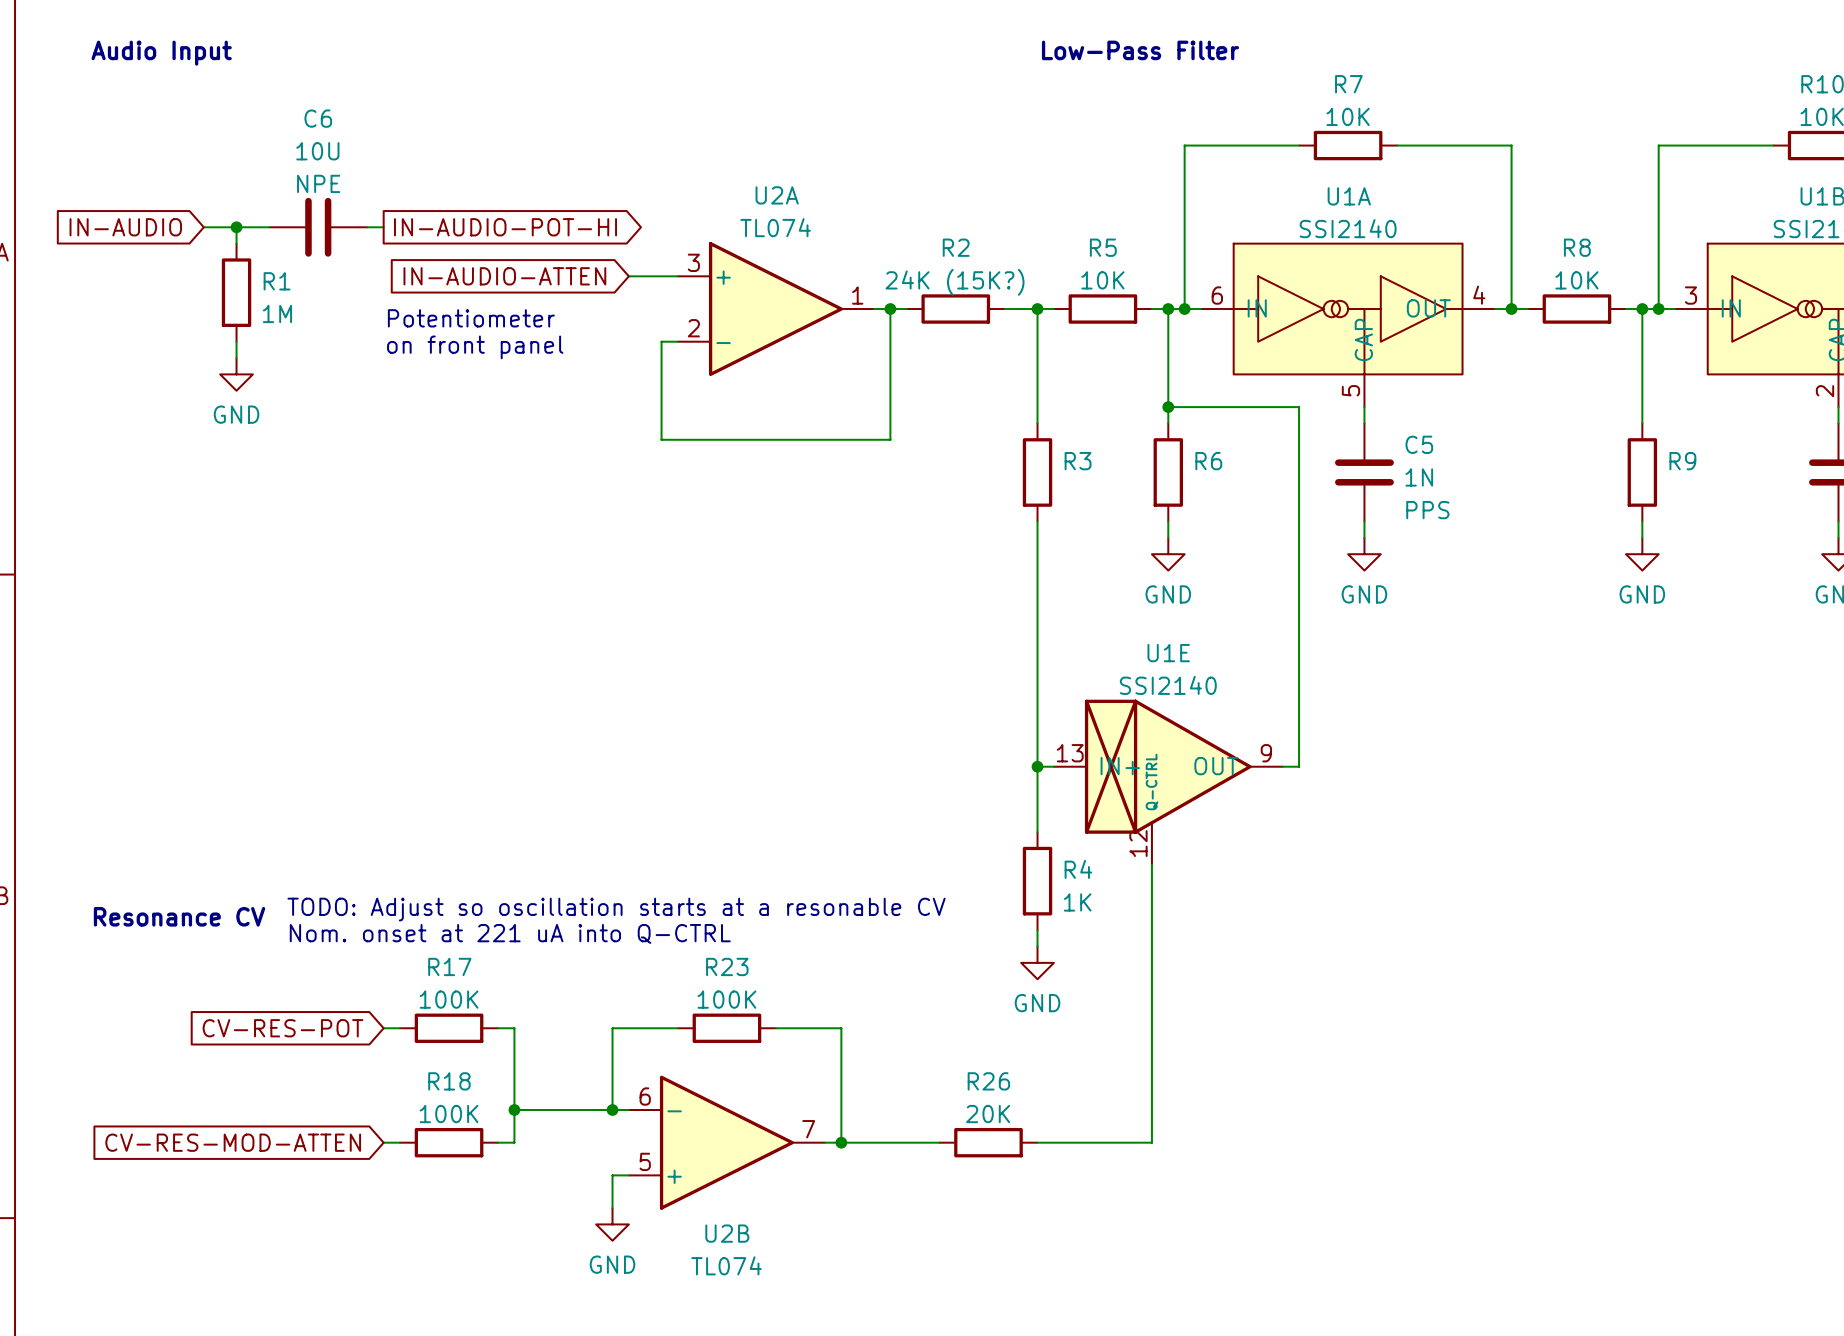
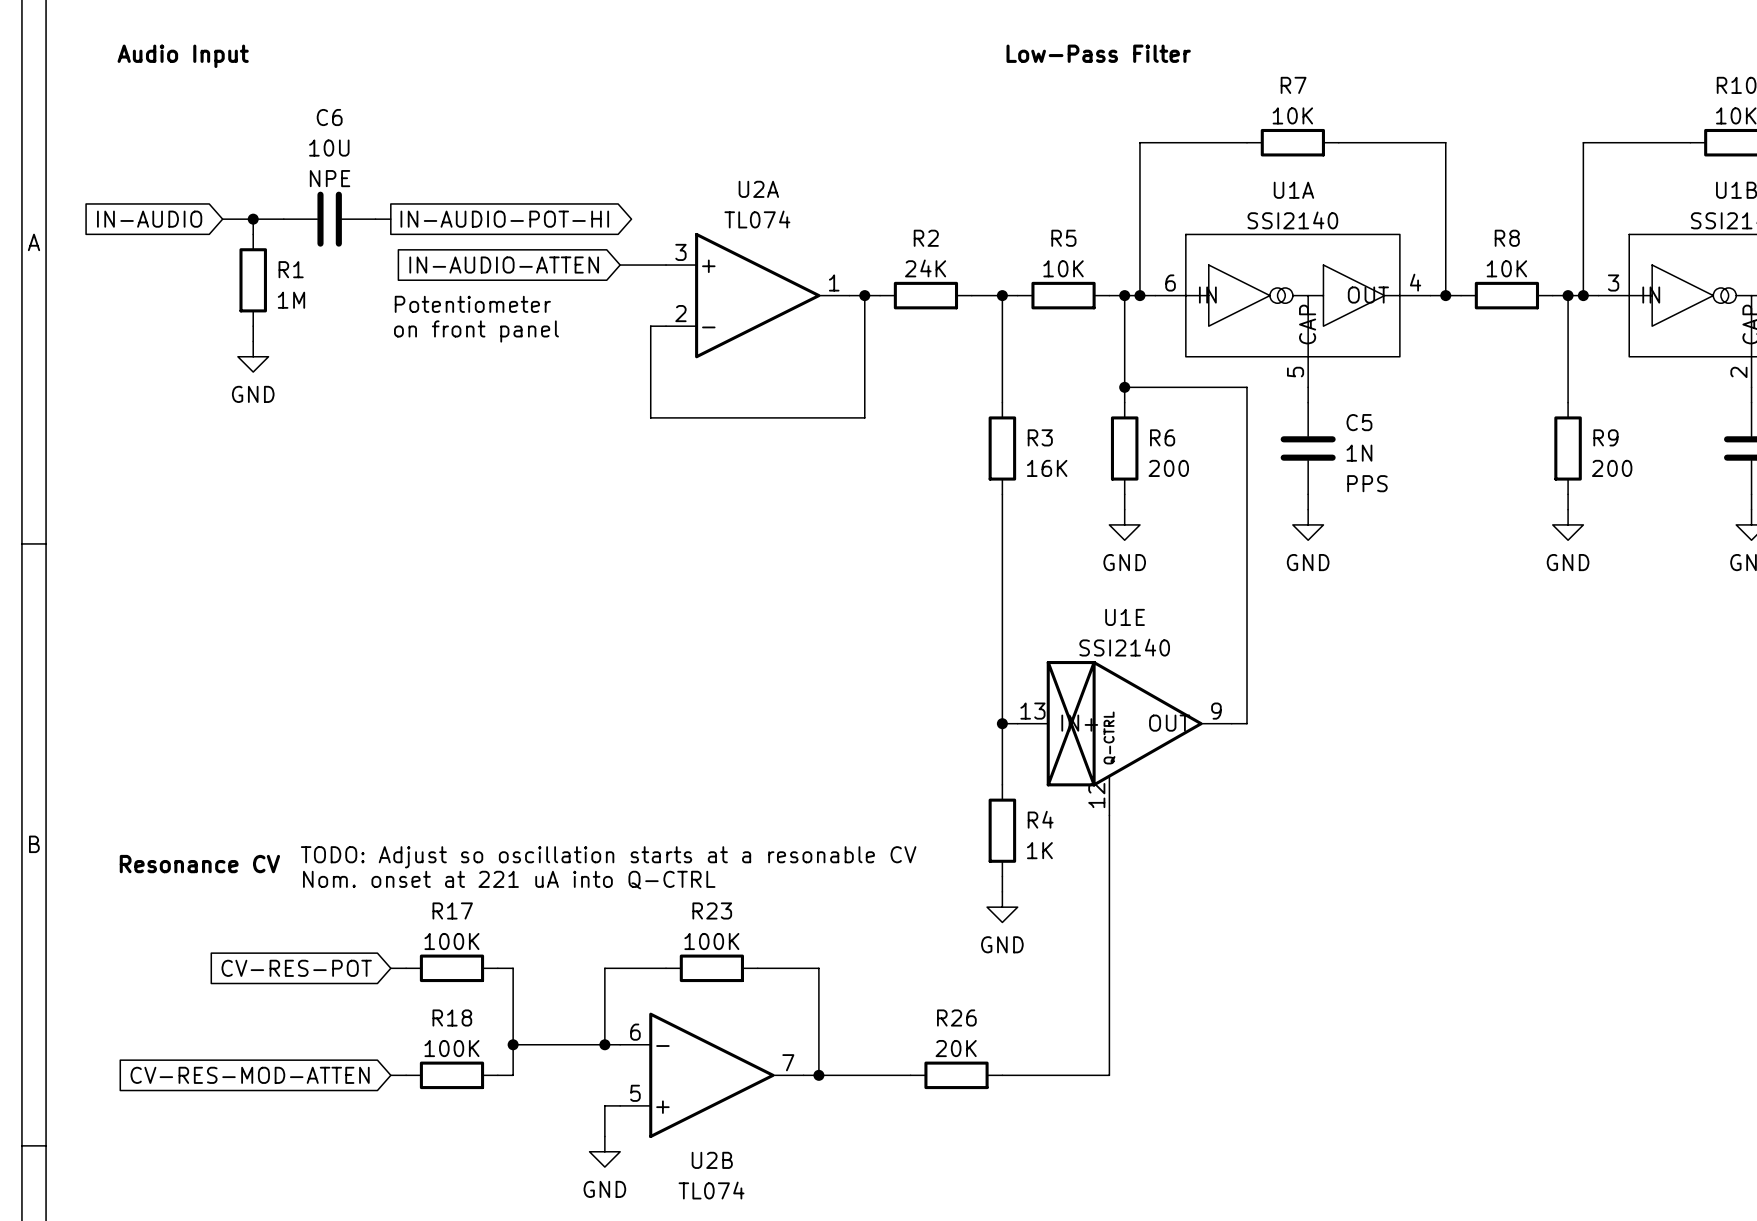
R2 value: 24K (15K?) (955, 282) -> 24K (925, 268)
R3 value: none -> 16K (1047, 468)
R6 value: none -> 200 (1168, 468)
R9 value: none -> 200 (1612, 468)

